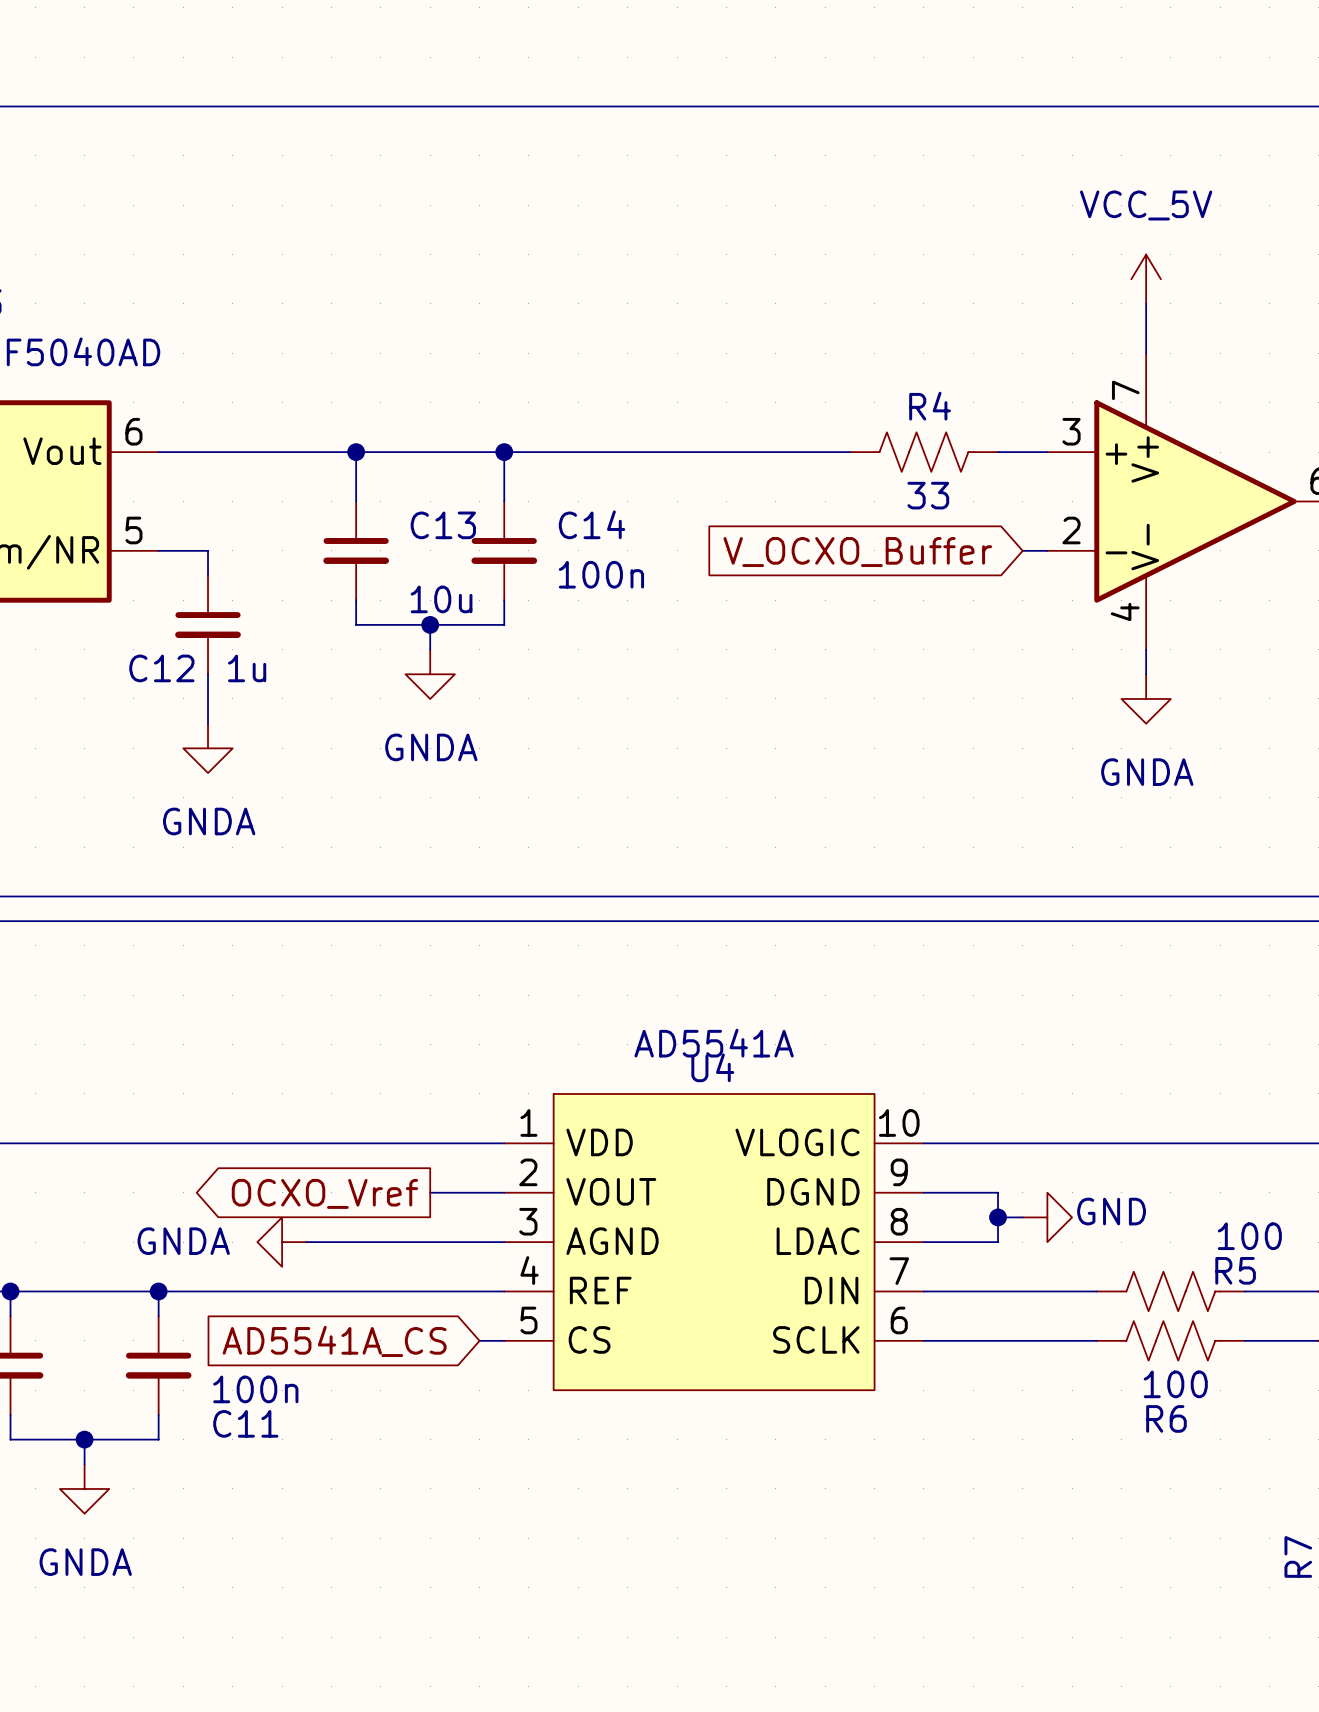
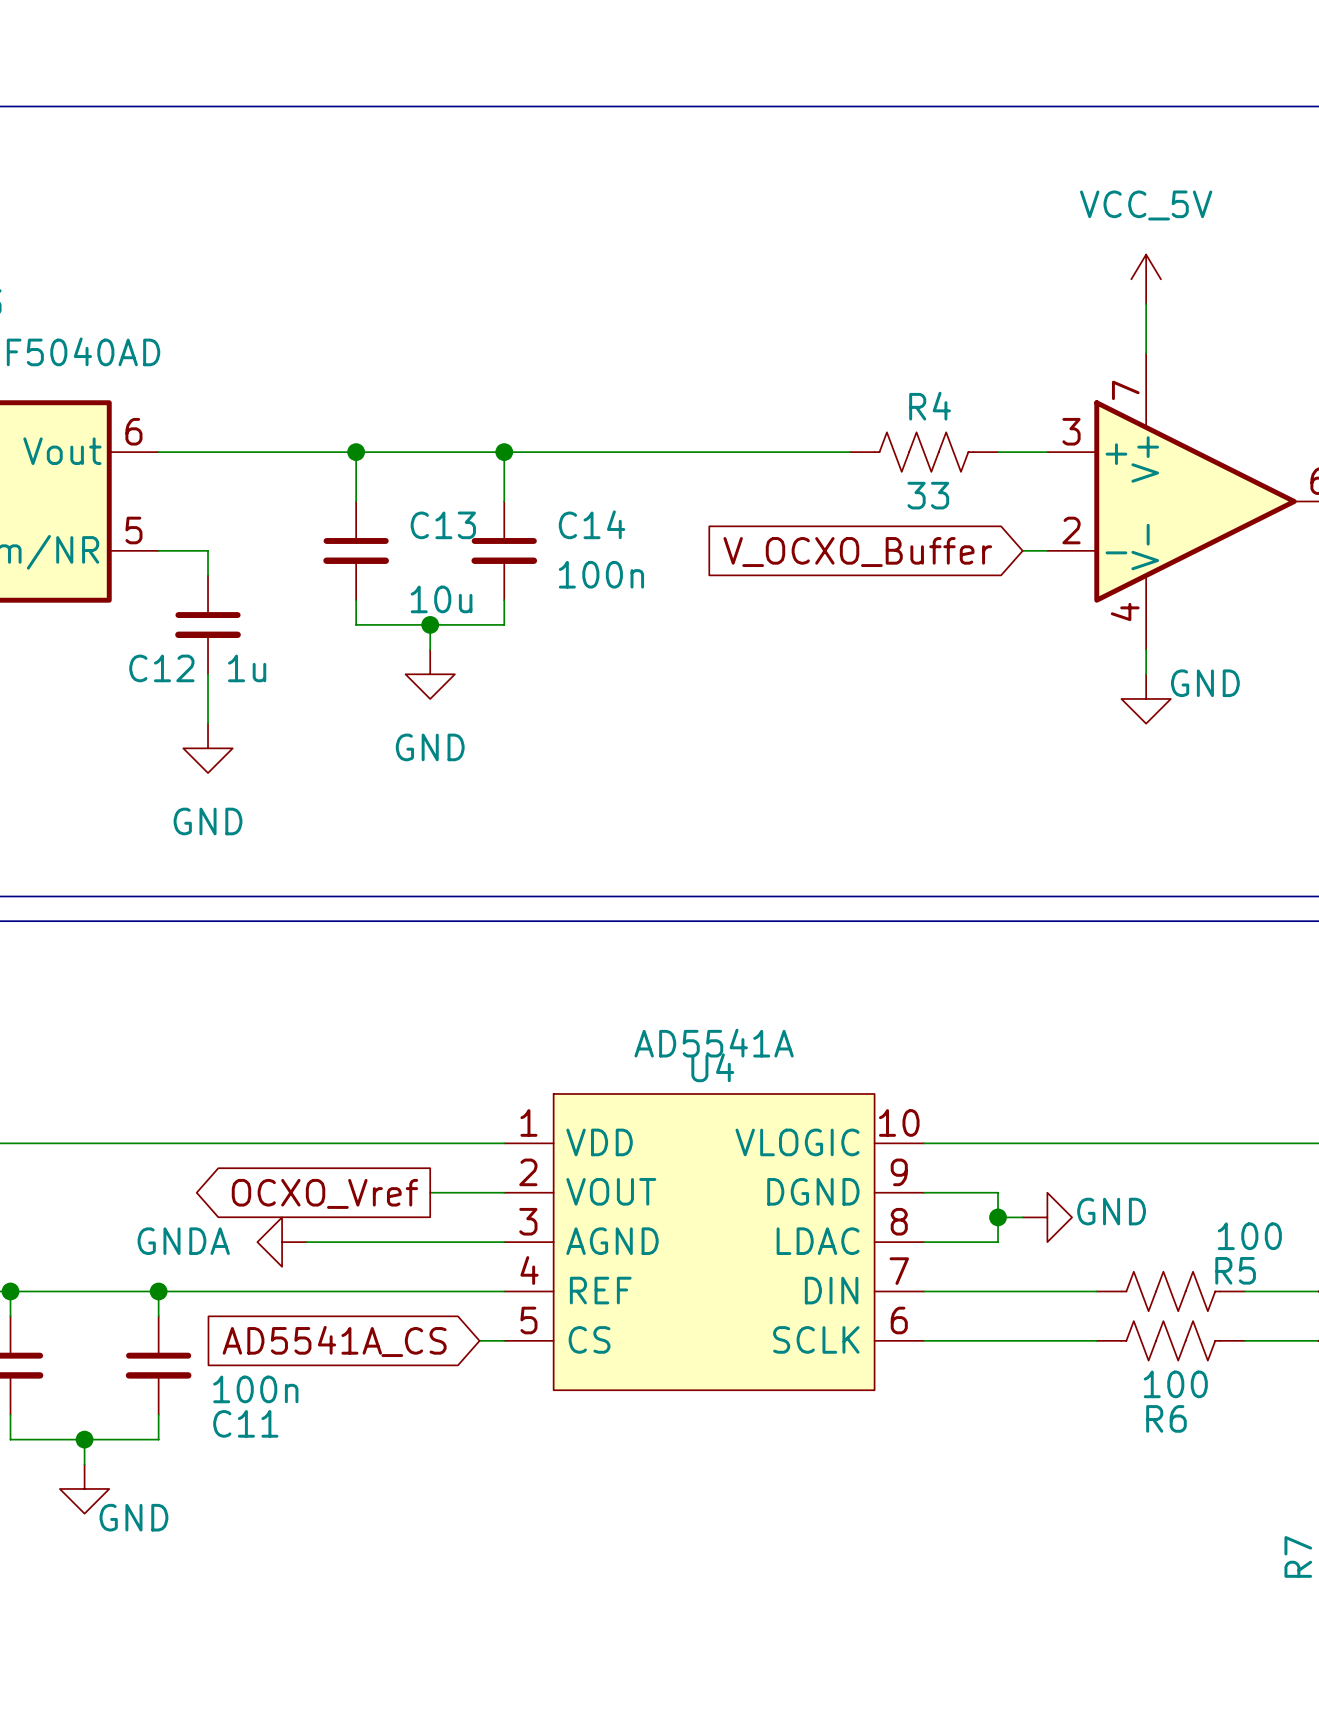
power symbol: GNDA (430, 674) -> GND (430, 674)
power symbol: GNDA (1146, 698) -> GND (1146, 698)
power symbol: GNDA (208, 748) -> GND (208, 748)
power symbol: GNDA (84, 1488) -> GND (84, 1488)

